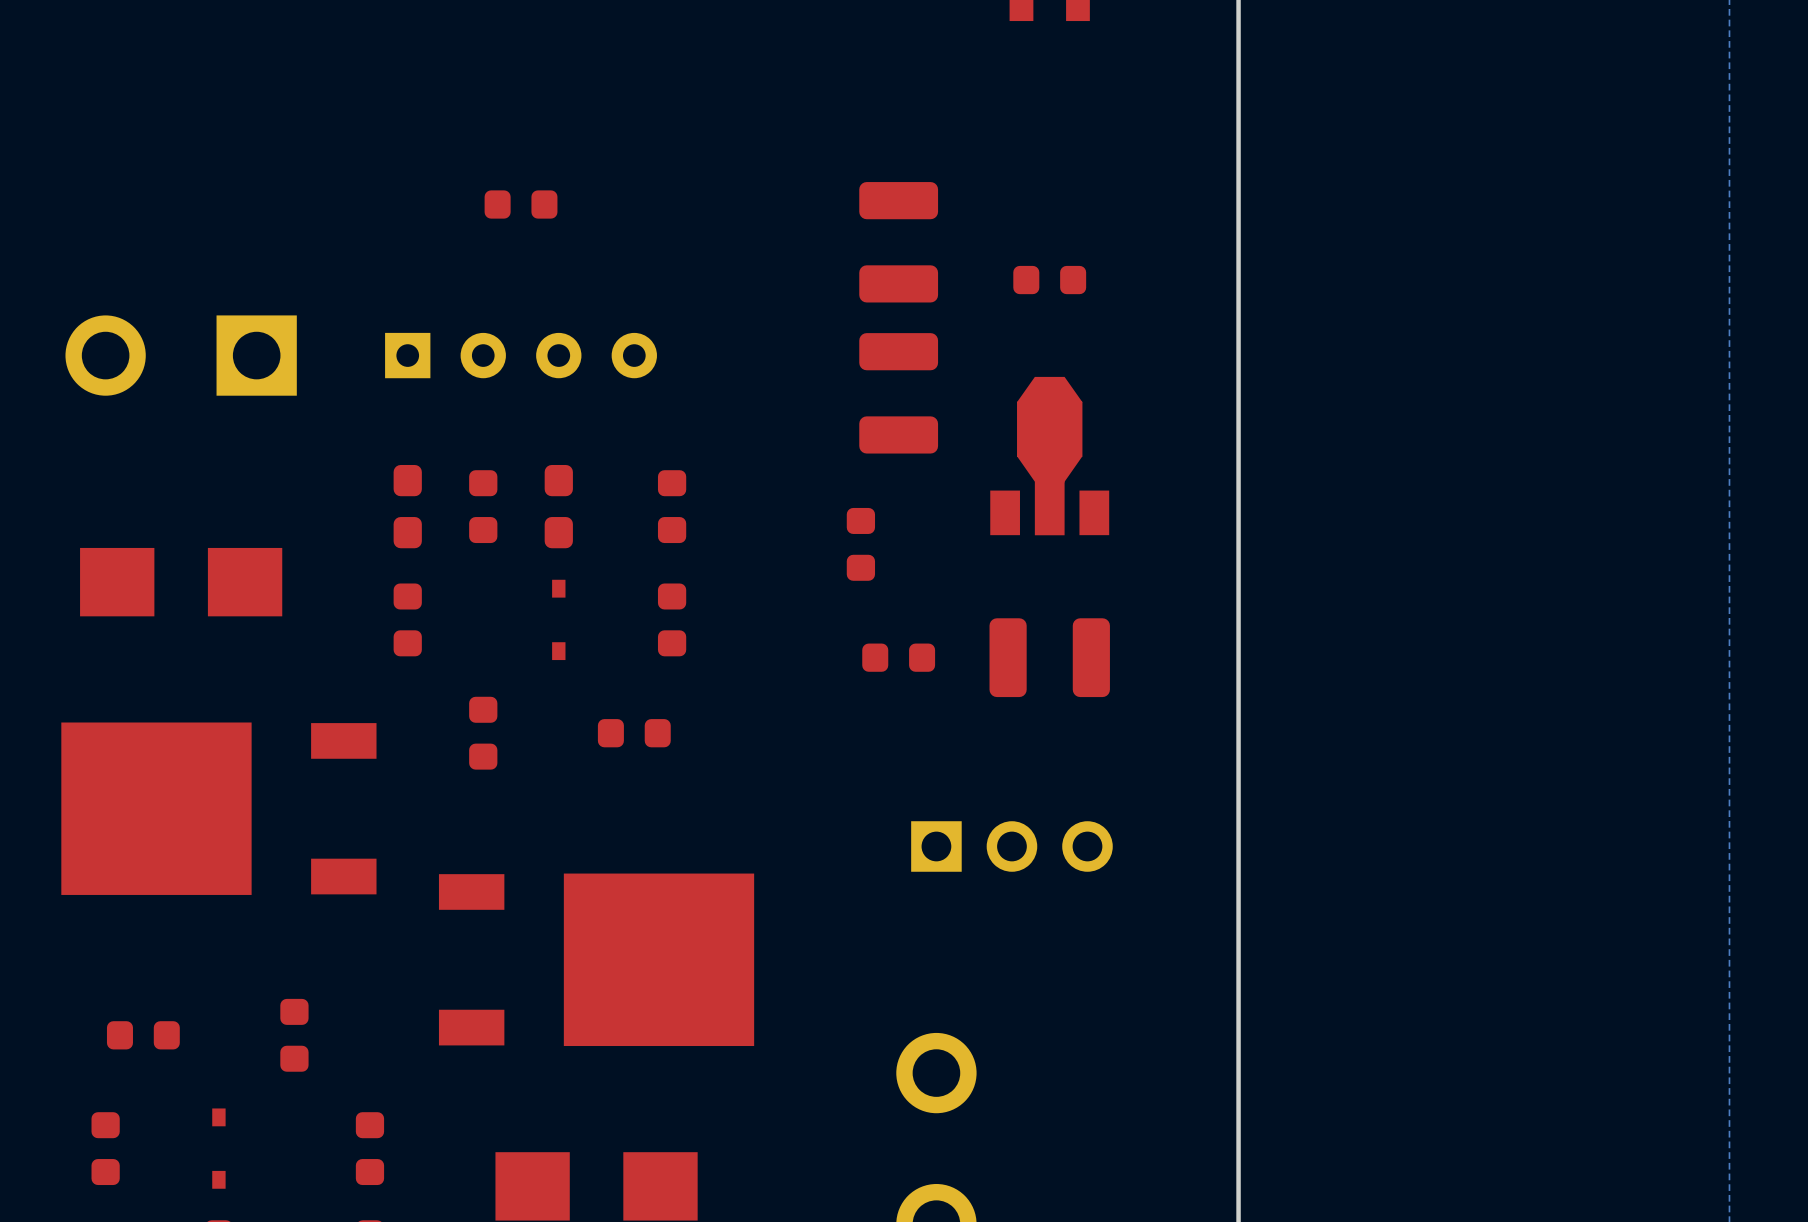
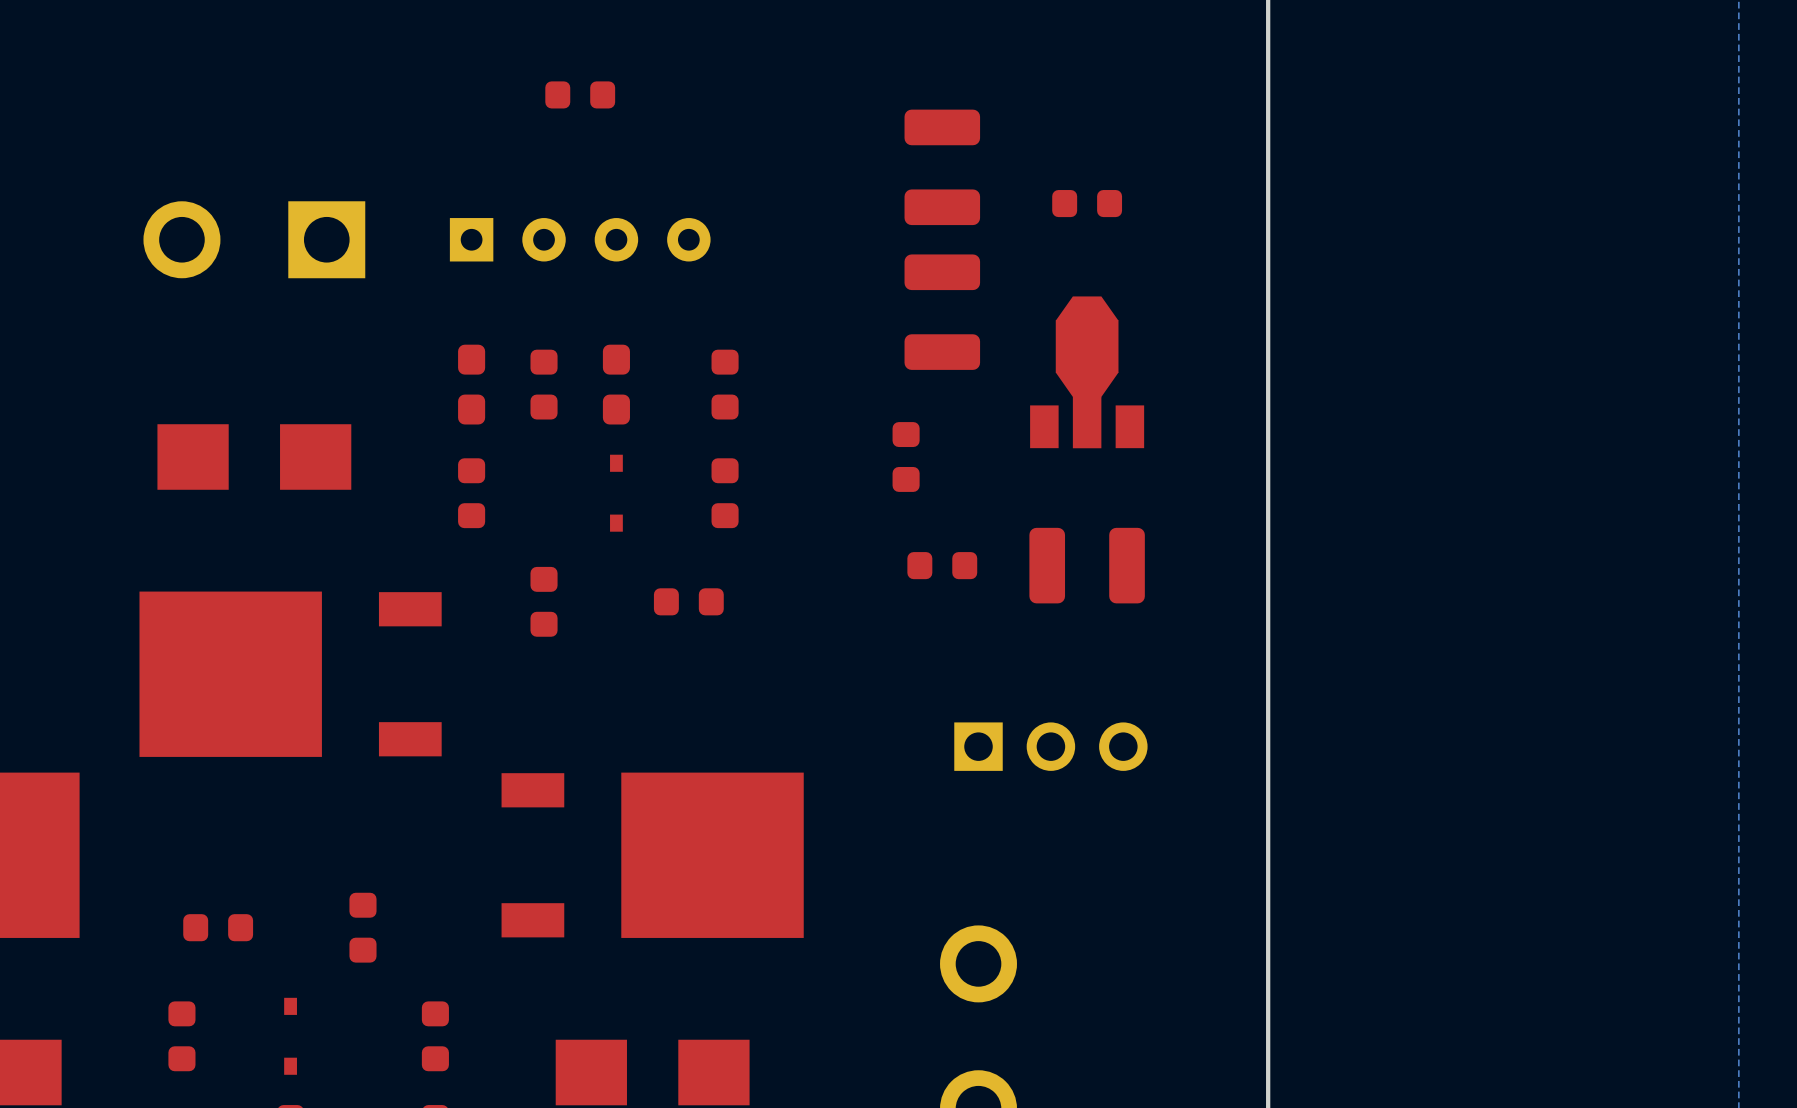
part position: (521, 204) -> (580, 94)
part position: (181, 355) -> (254, 239)
part position: (521, 355) -> (580, 239)
part: none -> (725, 384)
part position: (407, 506) -> (471, 384)
part position: (483, 506) -> (544, 384)
part position: (558, 506) -> (616, 384)
part: (672, 506) -> none
part position: (181, 582) -> (254, 457)
part: none -> (725, 493)
part position: (407, 619) -> (471, 493)
part position: (558, 619) -> (616, 493)
part: (672, 619) -> none
part position: (483, 733) -> (544, 601)
part position: (634, 733) -> (688, 601)
part position: (218, 808) -> (290, 674)

